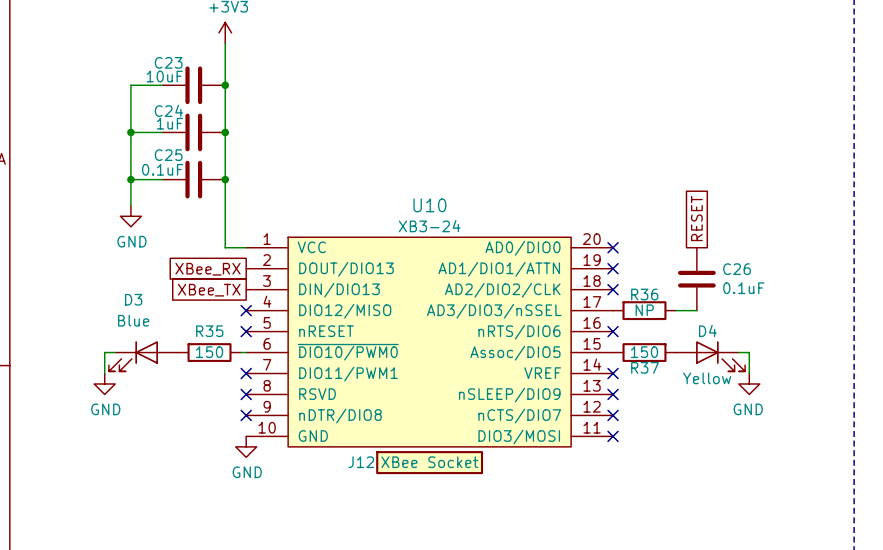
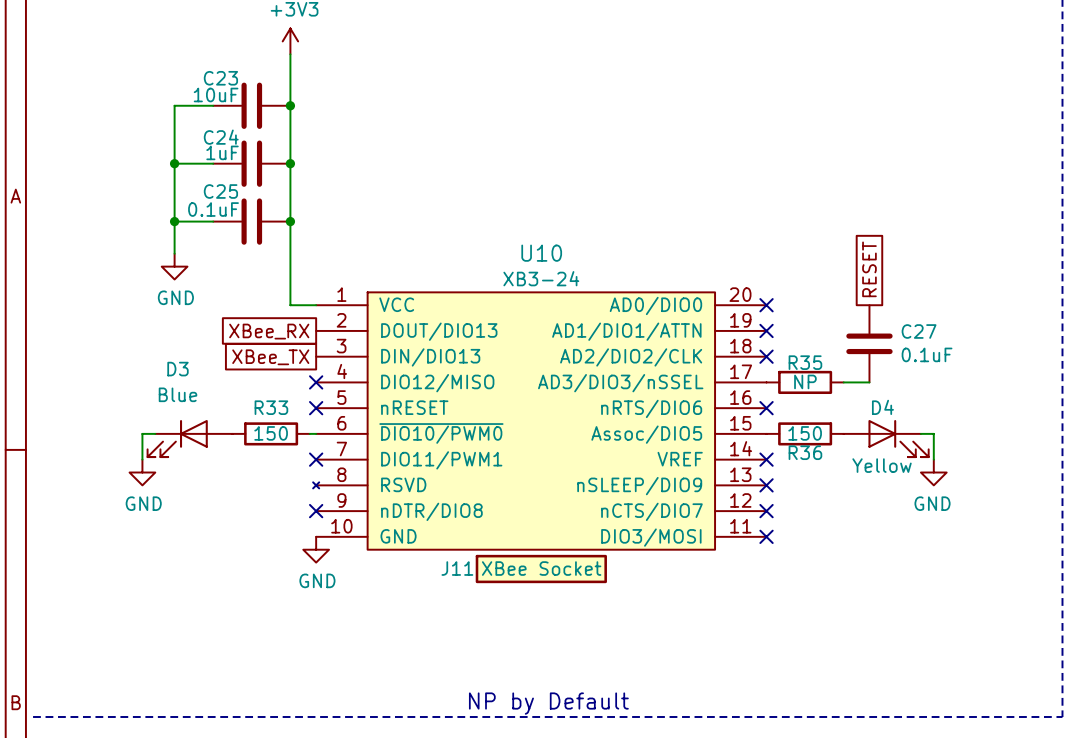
U10 symbol: [246, 237, 614, 447] -> [313, 292, 767, 550]
C26 name: C26 (737, 269) -> C27 (919, 331)
R36 name: R36 (644, 294) -> R35 (805, 362)
R35 name: R35 (209, 331) -> R33 (271, 407)
R37 name: R37 (644, 367) -> R36 (805, 452)
no-connect mark: (246, 394) -> none
J12 name: J12 (361, 462) -> J11 (457, 568)

